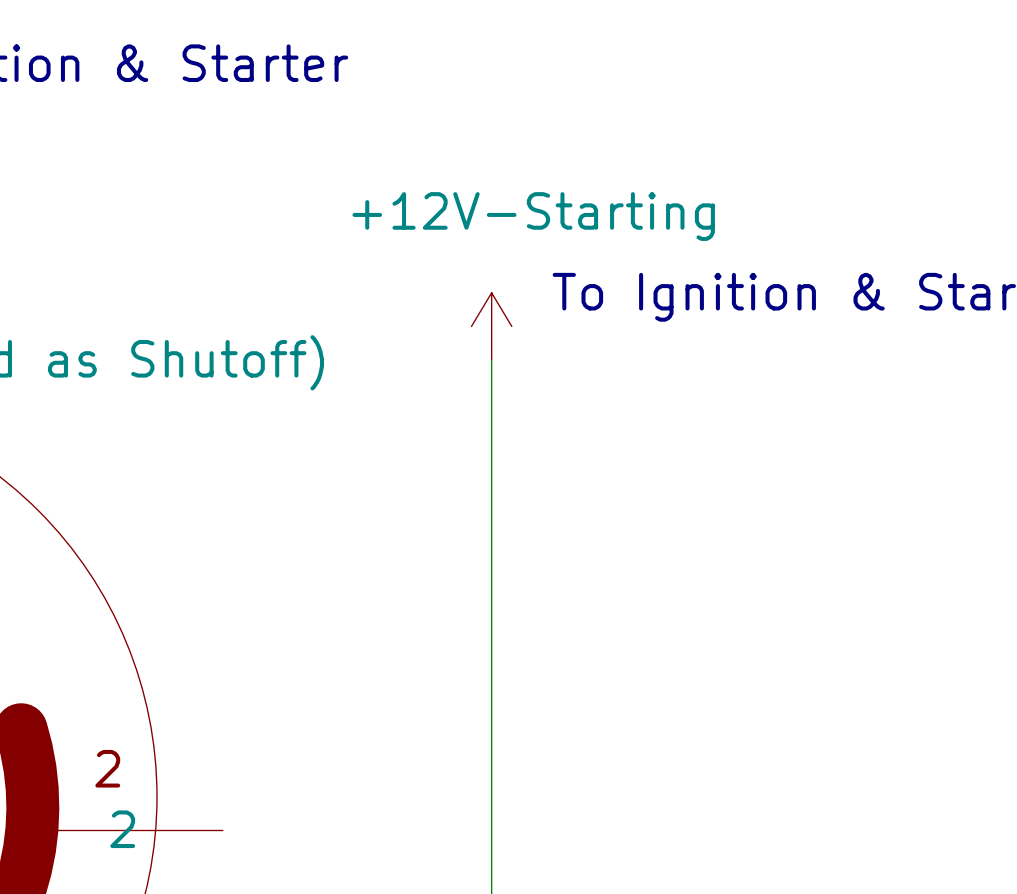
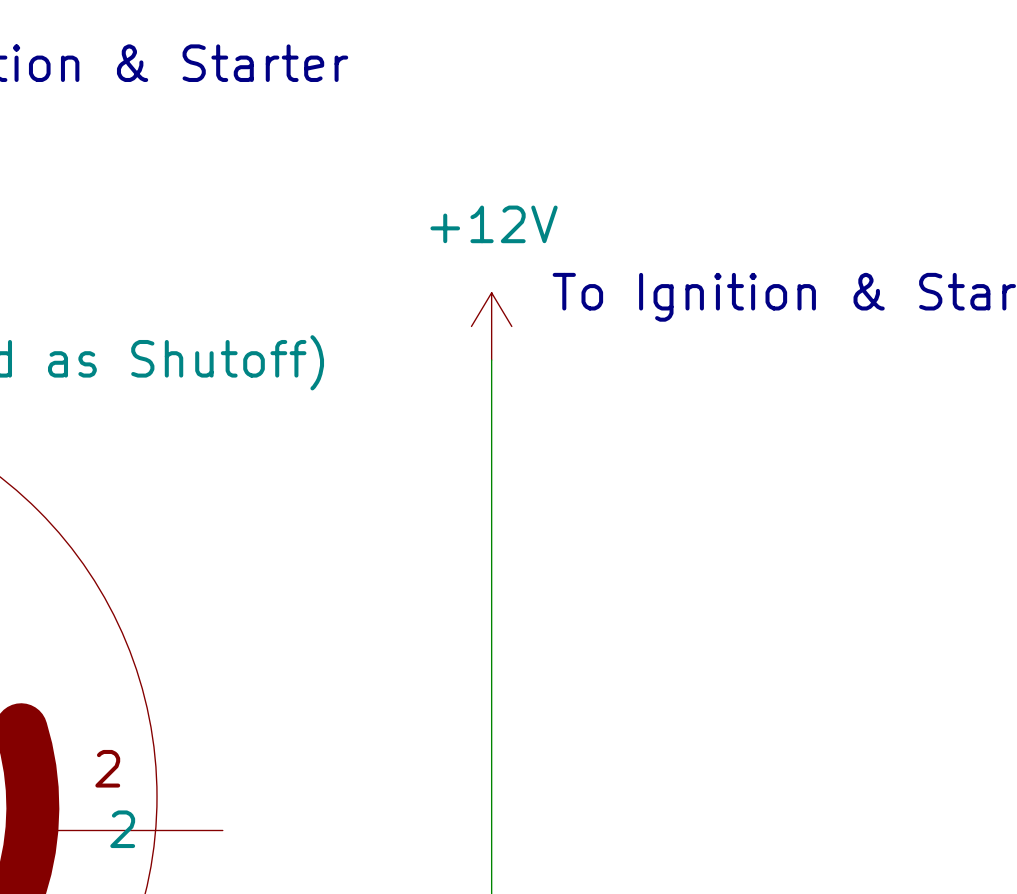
power symbol: +12V-Starting (491, 326) -> +12V (491, 326)

